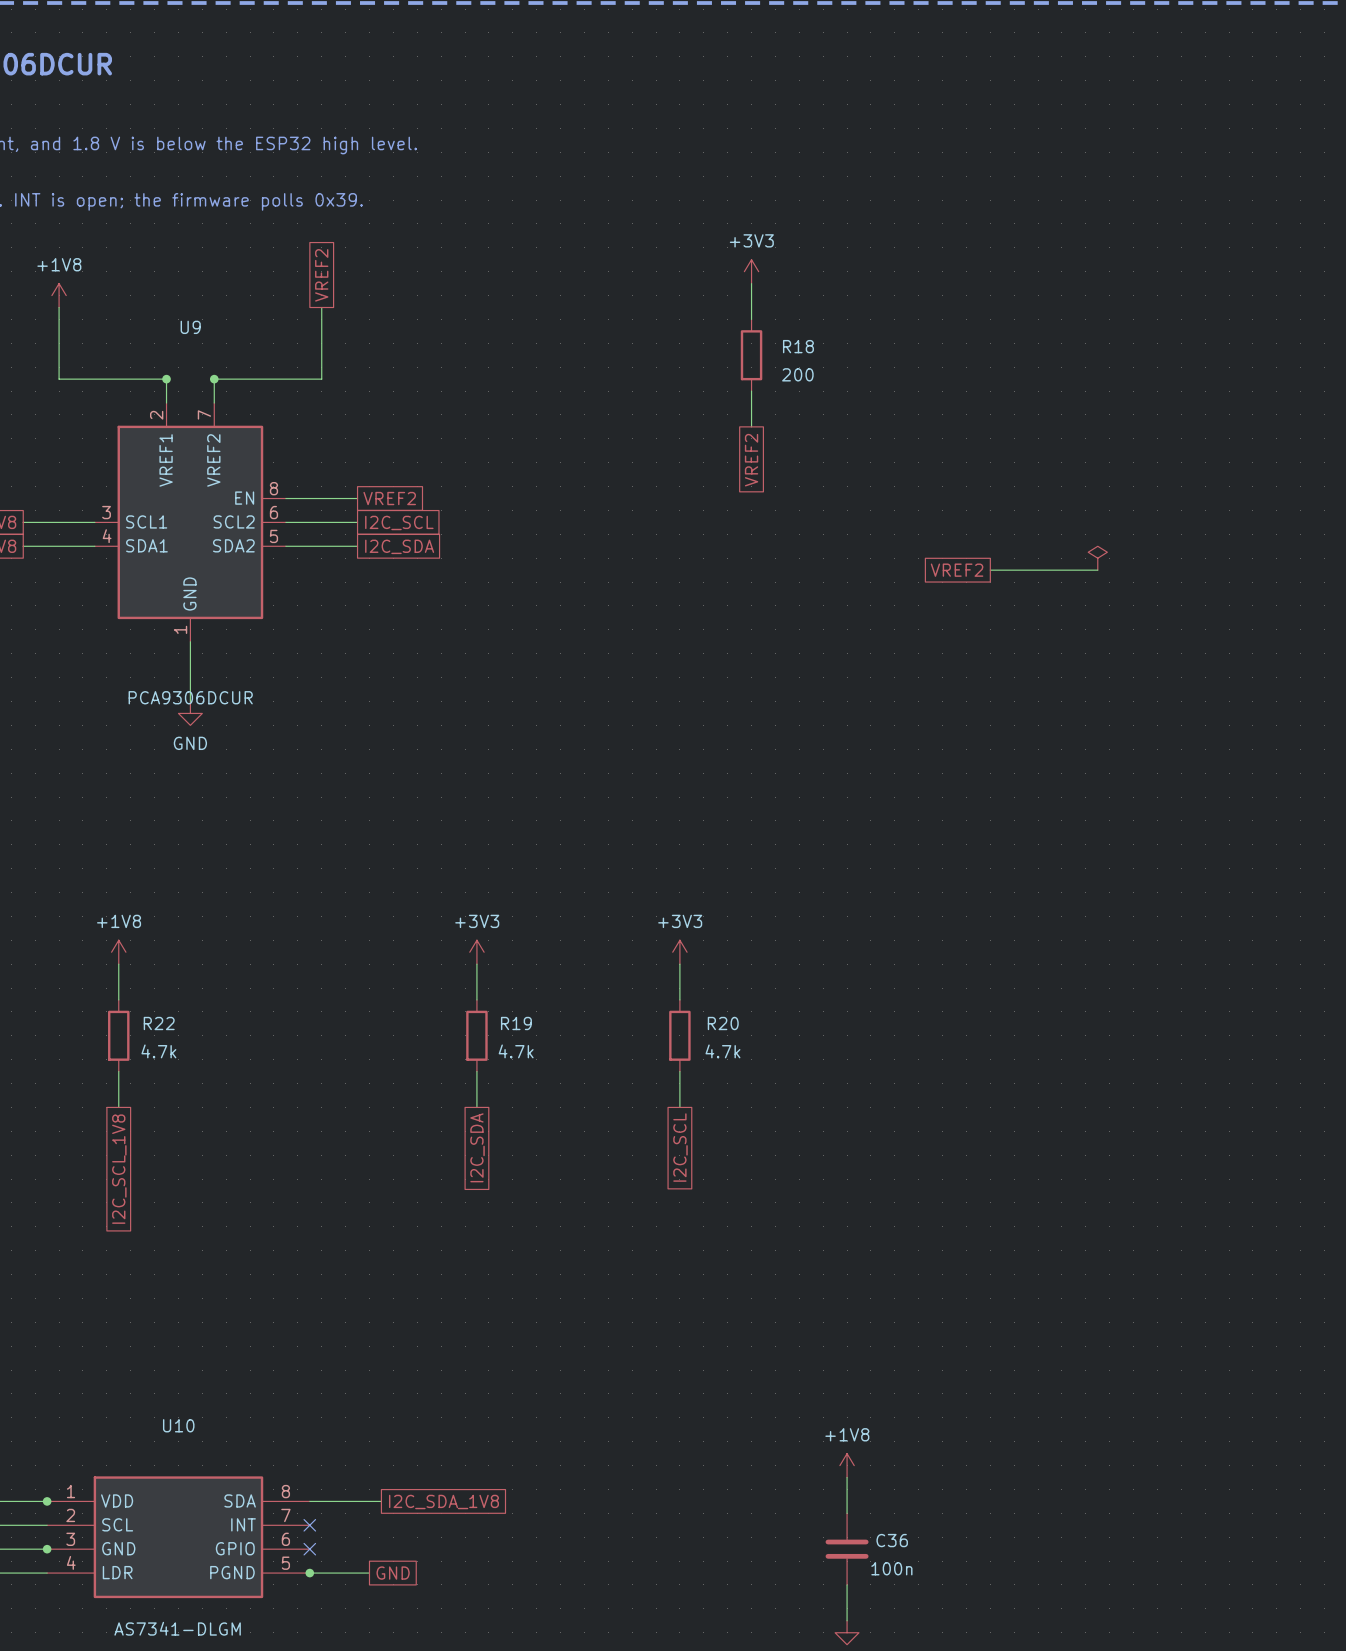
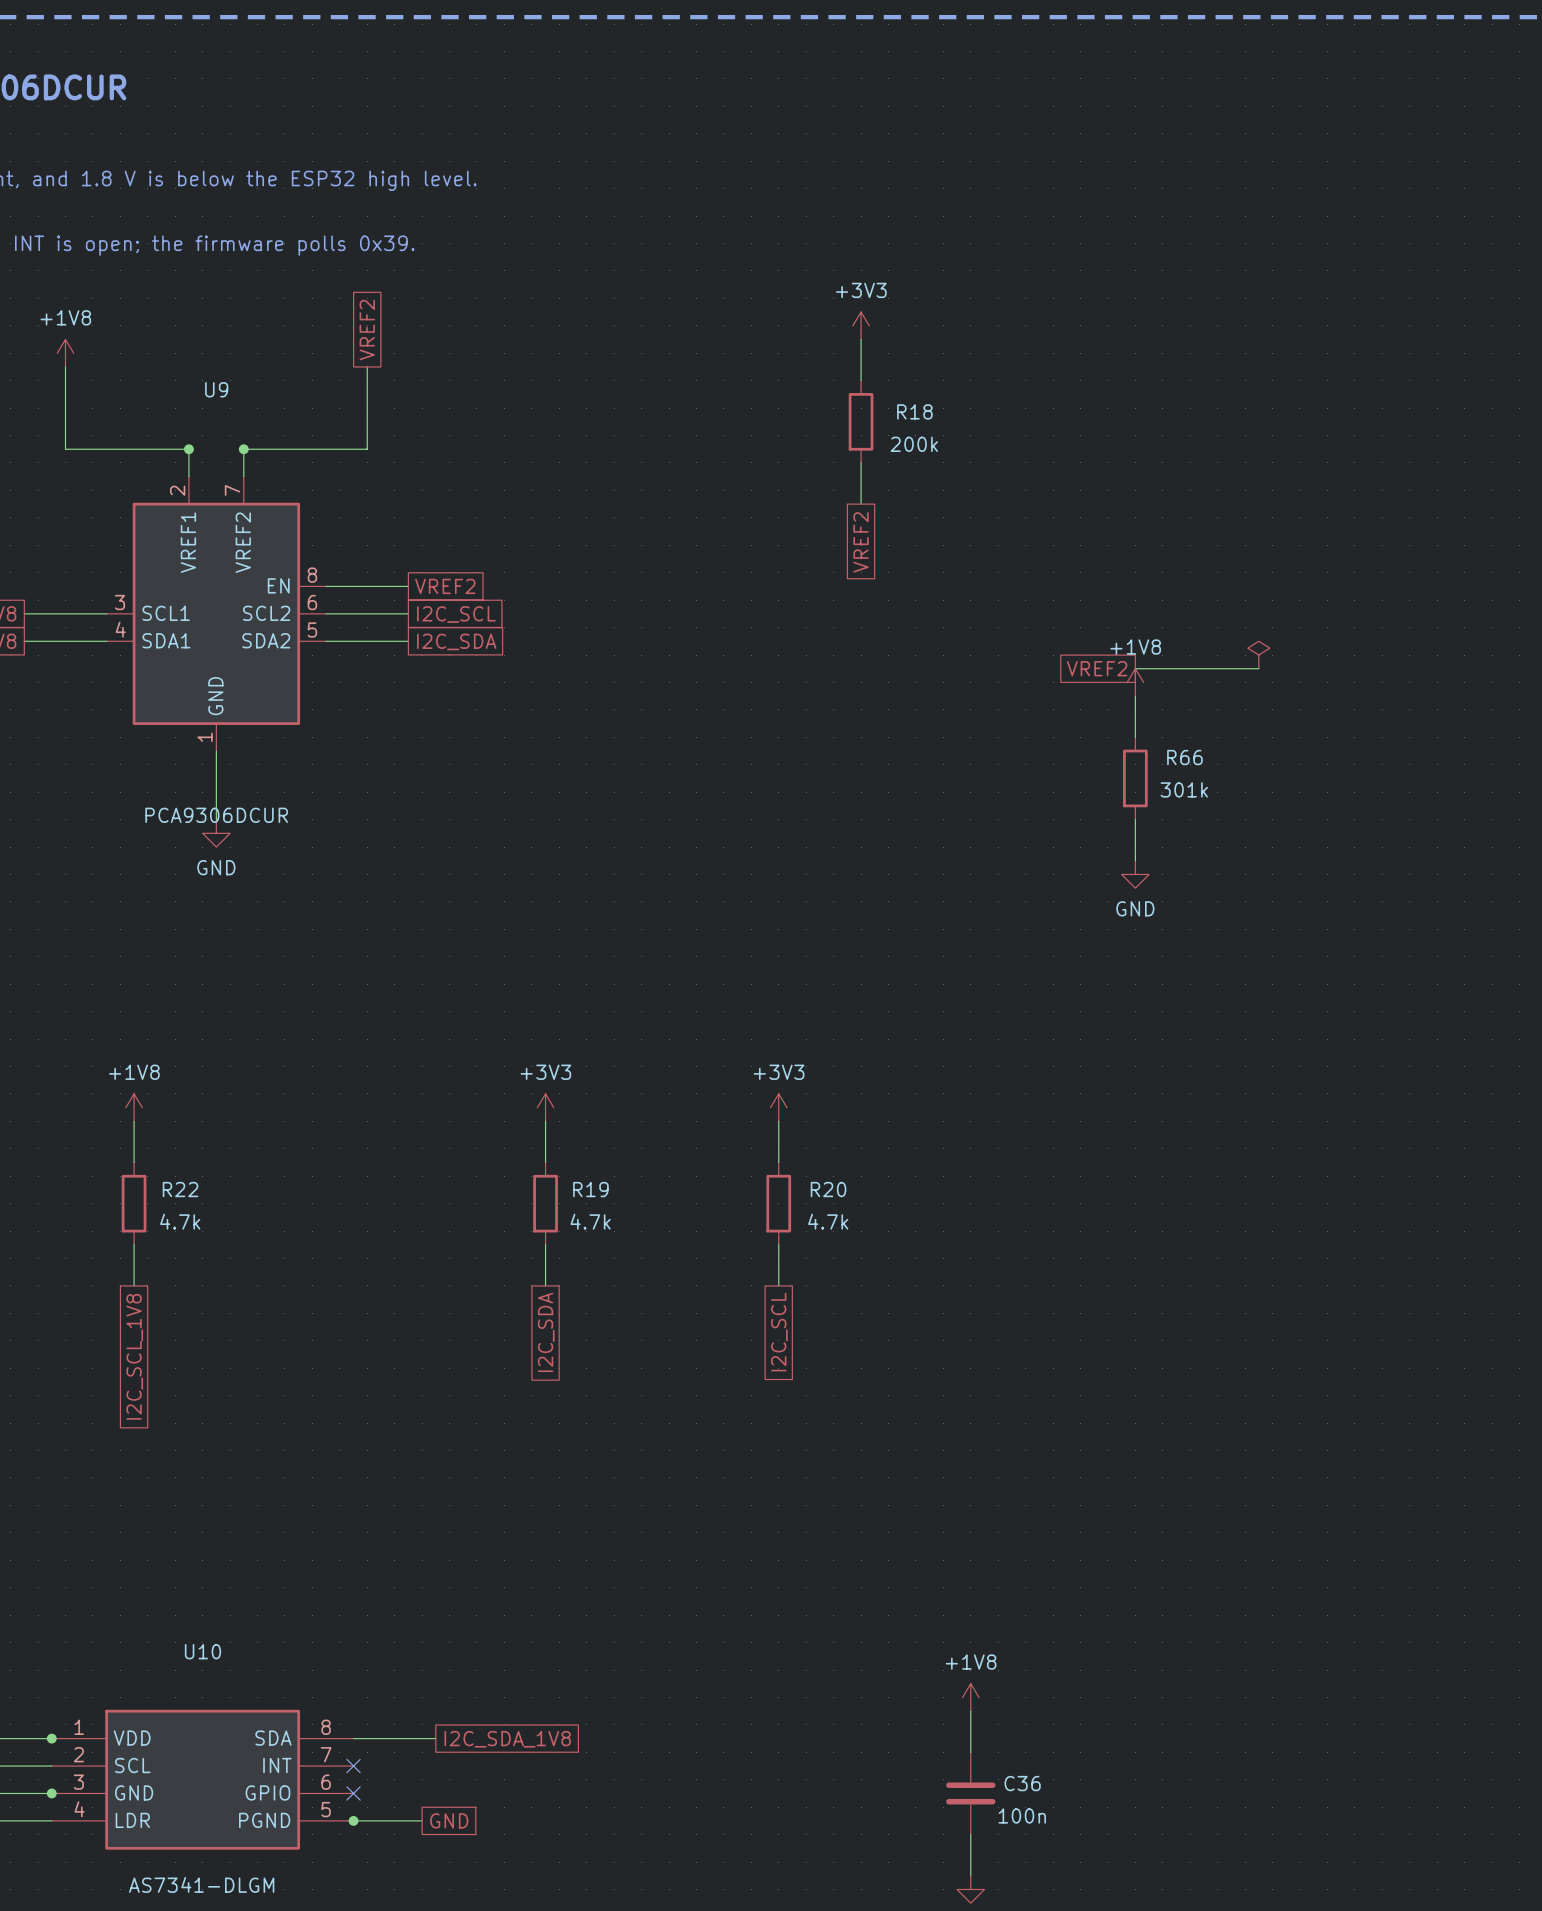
R18 value: 200 (797, 374) -> 200k (914, 444)
power symbol: none -> +1V8 (1135, 682)
wire: none -> (1135, 696) (1135, 737)
R66: none -> 301k (1135, 778)
wire: none -> (1135, 819) (1135, 860)
power symbol: none -> GND (1135, 874)

